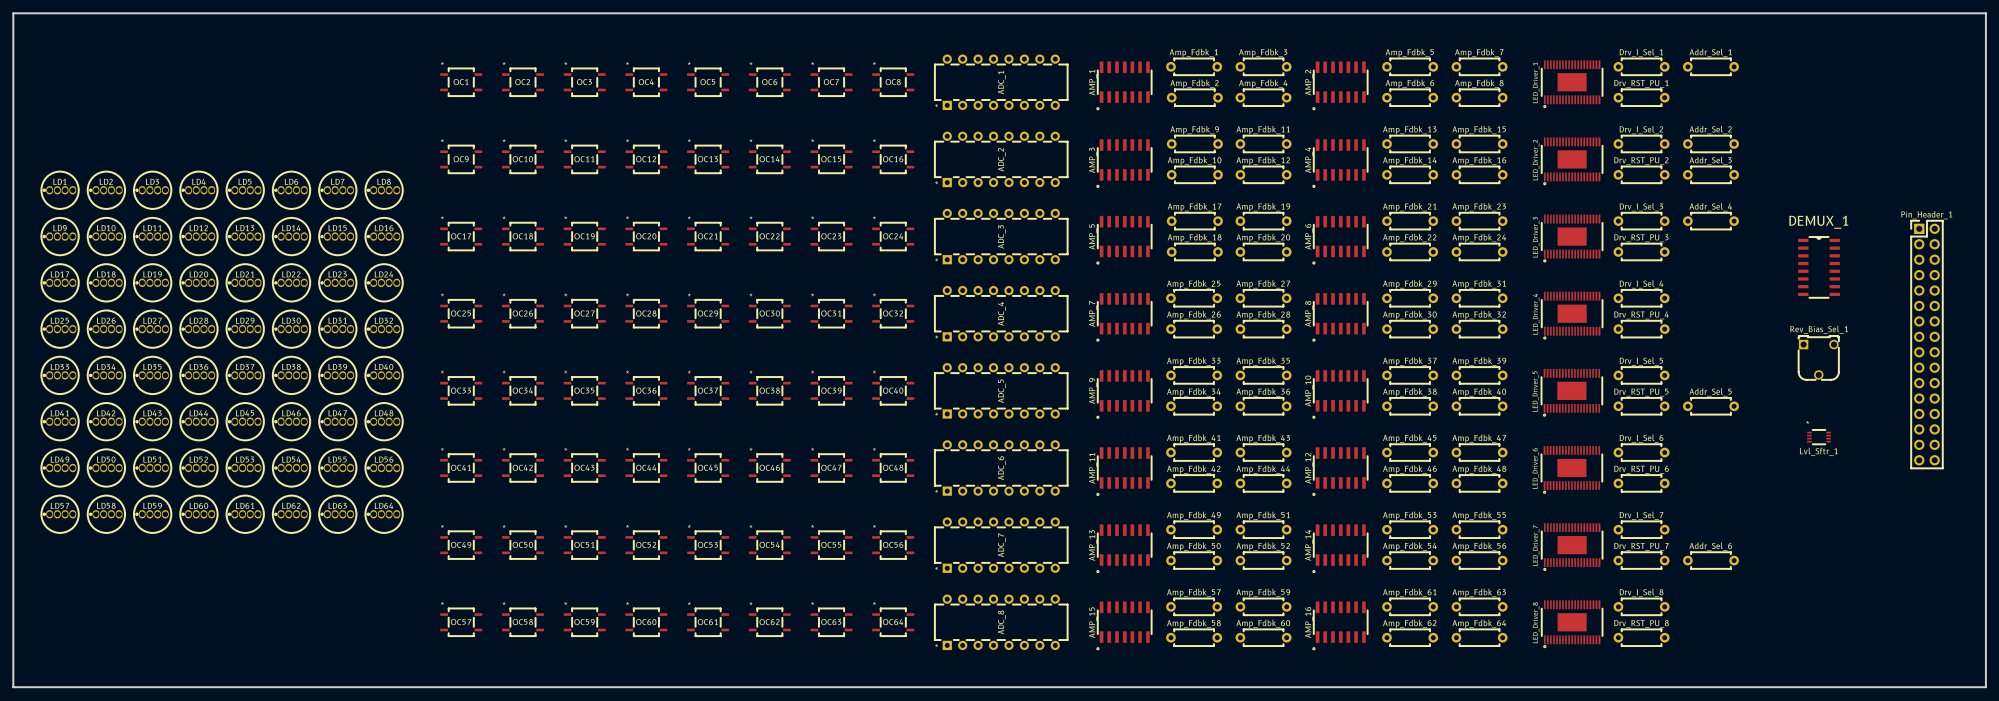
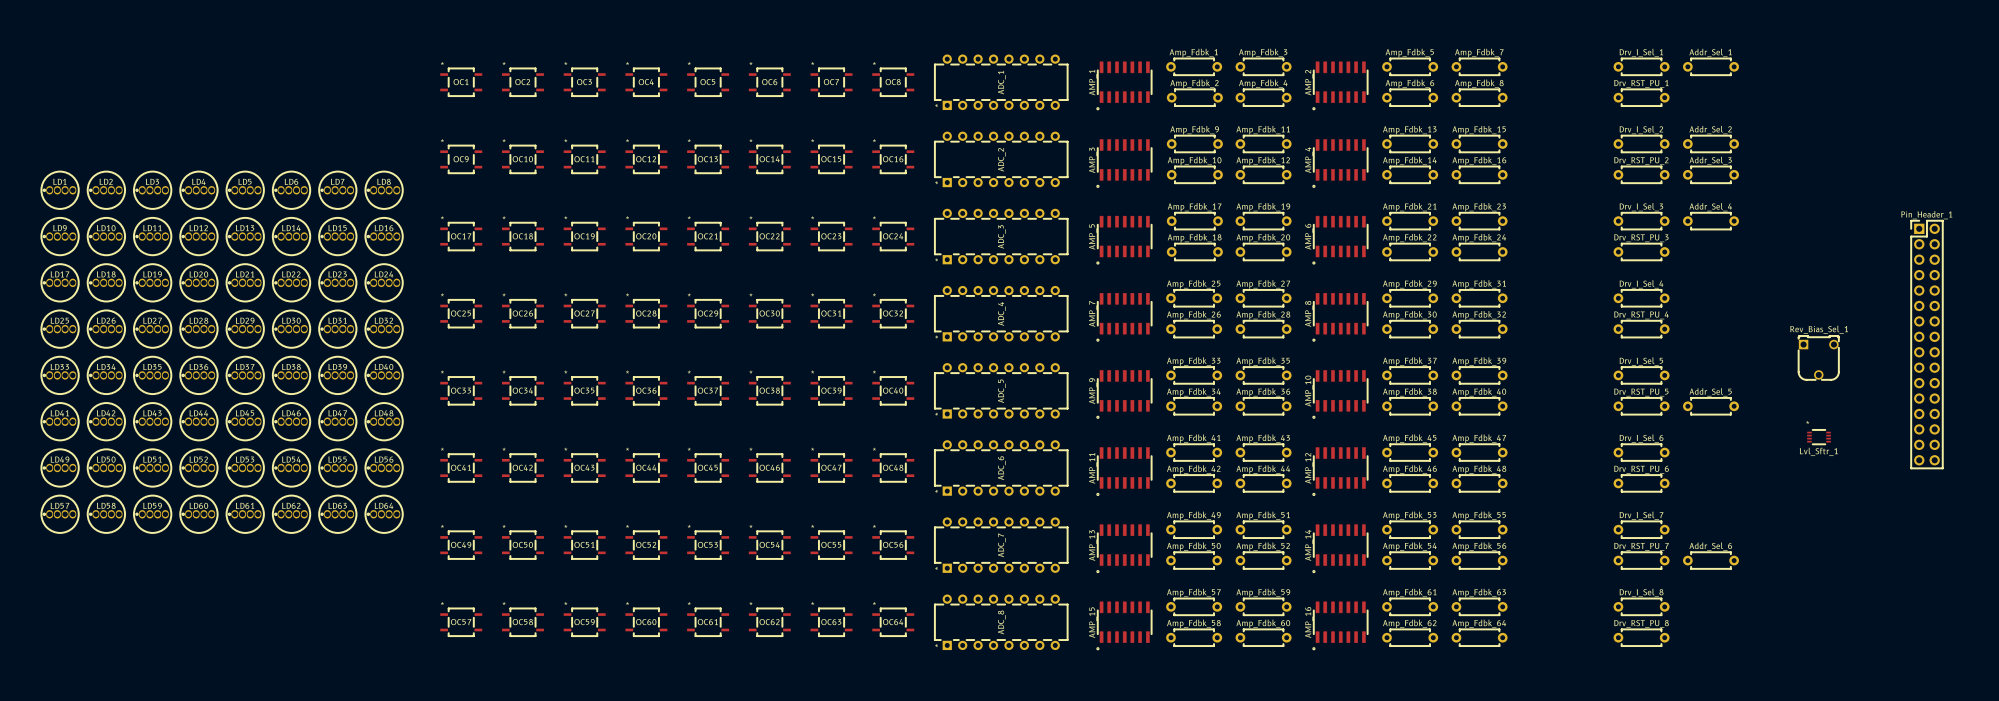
board edge: (13, 13) (1985, 13) (1985, 687) (13, 687) (13, 13) -> none
part: (1572, 84) -> none
part: (1572, 161) -> none
part: (1572, 238) -> none
DEMUX_1: (1819, 267) -> none
part: (1572, 315) -> none
part: (1571, 392) -> none
part: (1571, 469) -> none
part: (1572, 546) -> none
part: (1572, 624) -> none

